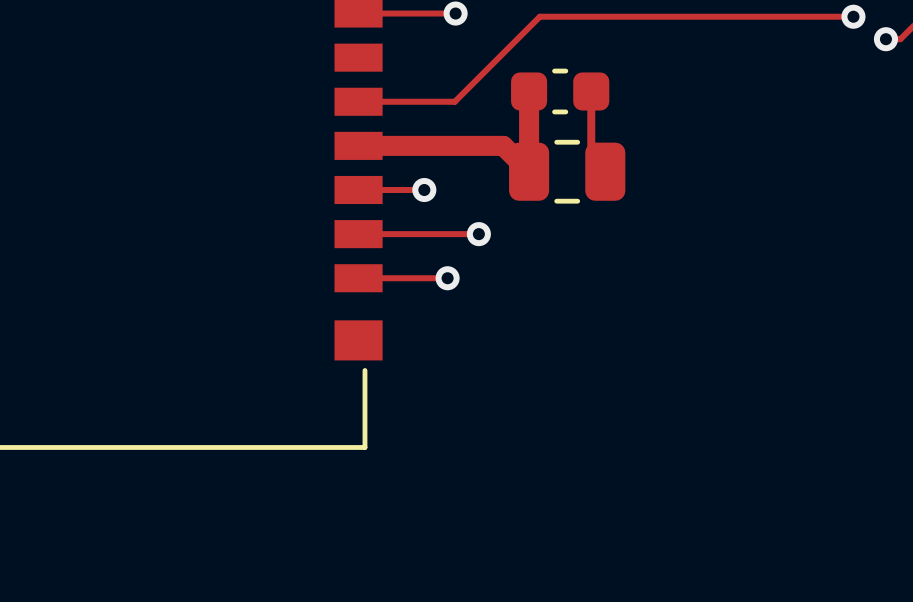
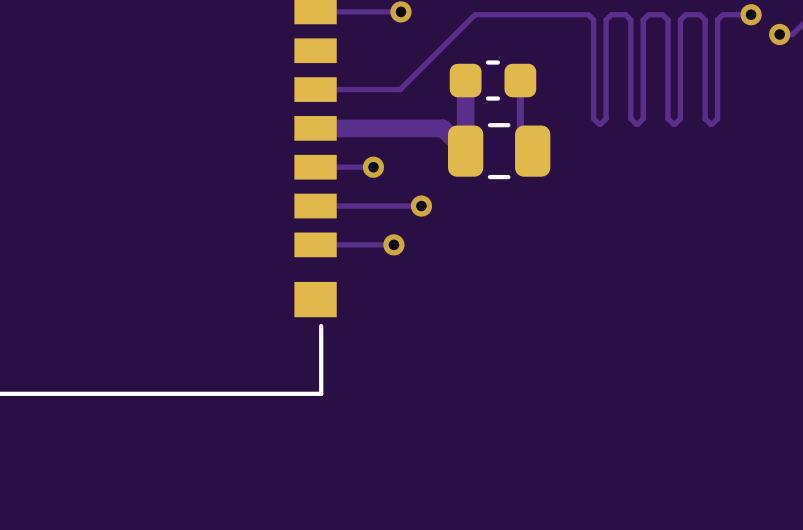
track: (668, 16) (694, 16) -> (588, 14) (593, 20) (593, 118) (598, 123) (606, 118) (606, 20) (611, 14)
track: (710, 16) (736, 16) -> (625, 14) (630, 20) (630, 118) (636, 123) (643, 118) (643, 20) (648, 14)
track: (752, 16) (779, 16) -> (662, 14) (667, 20) (667, 118) (673, 123) (680, 118) (680, 20) (685, 14)
track: (795, 16) (821, 16) -> (699, 14) (705, 20) (705, 118) (710, 123) (717, 118) (717, 20) (722, 14)

